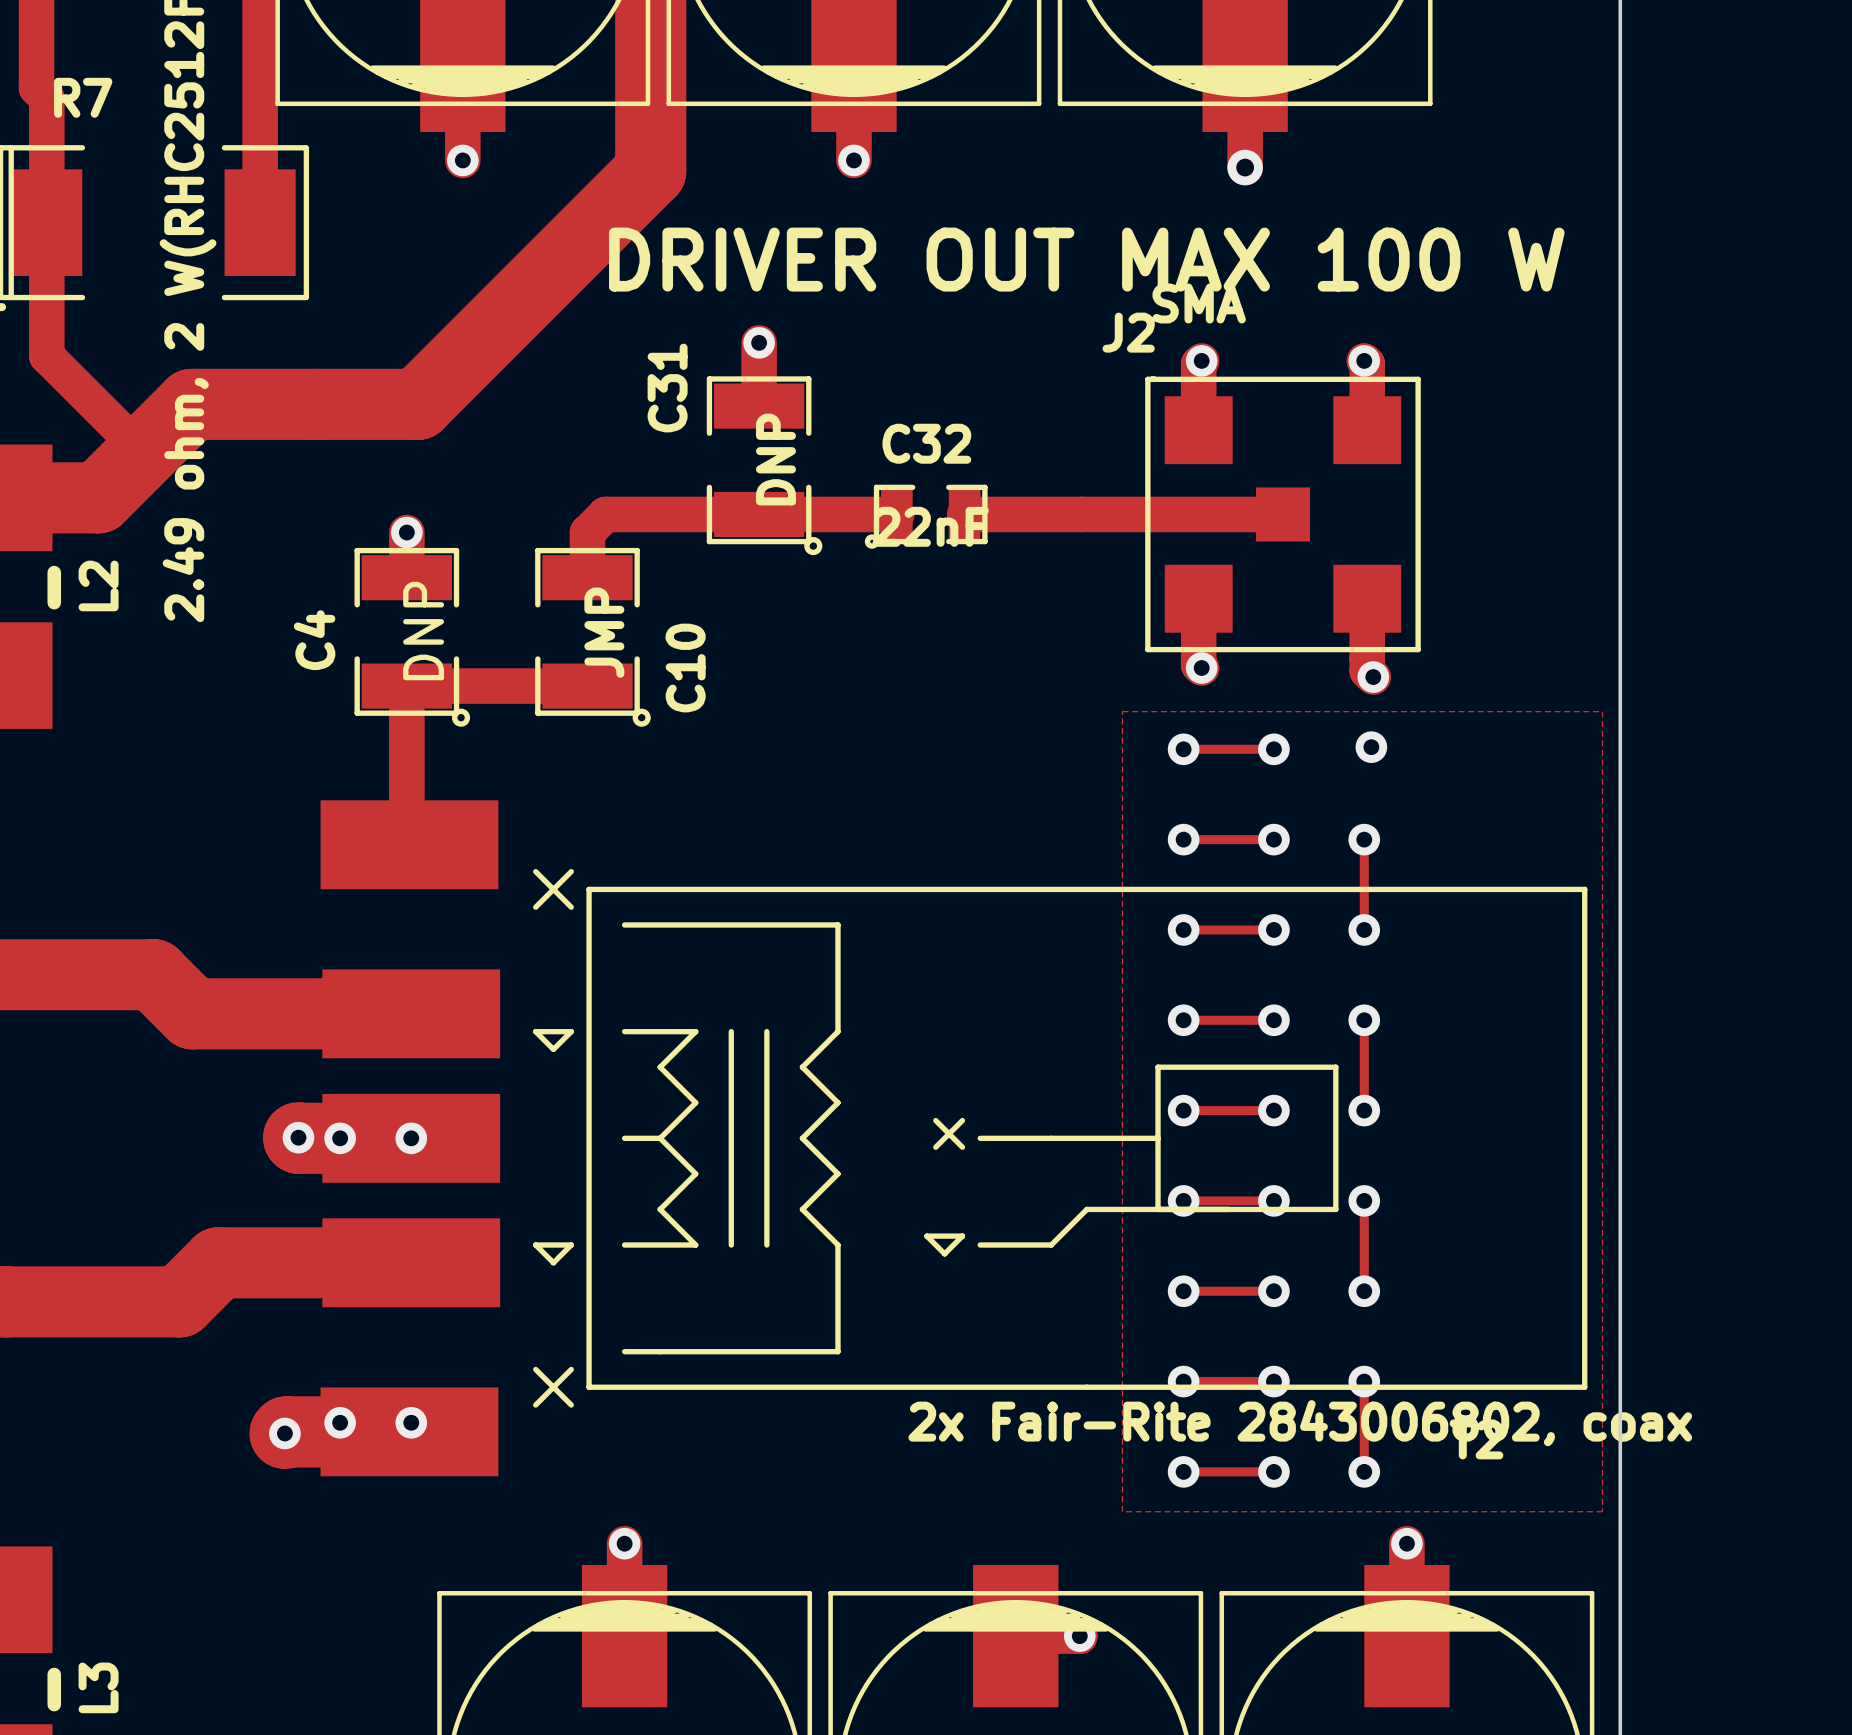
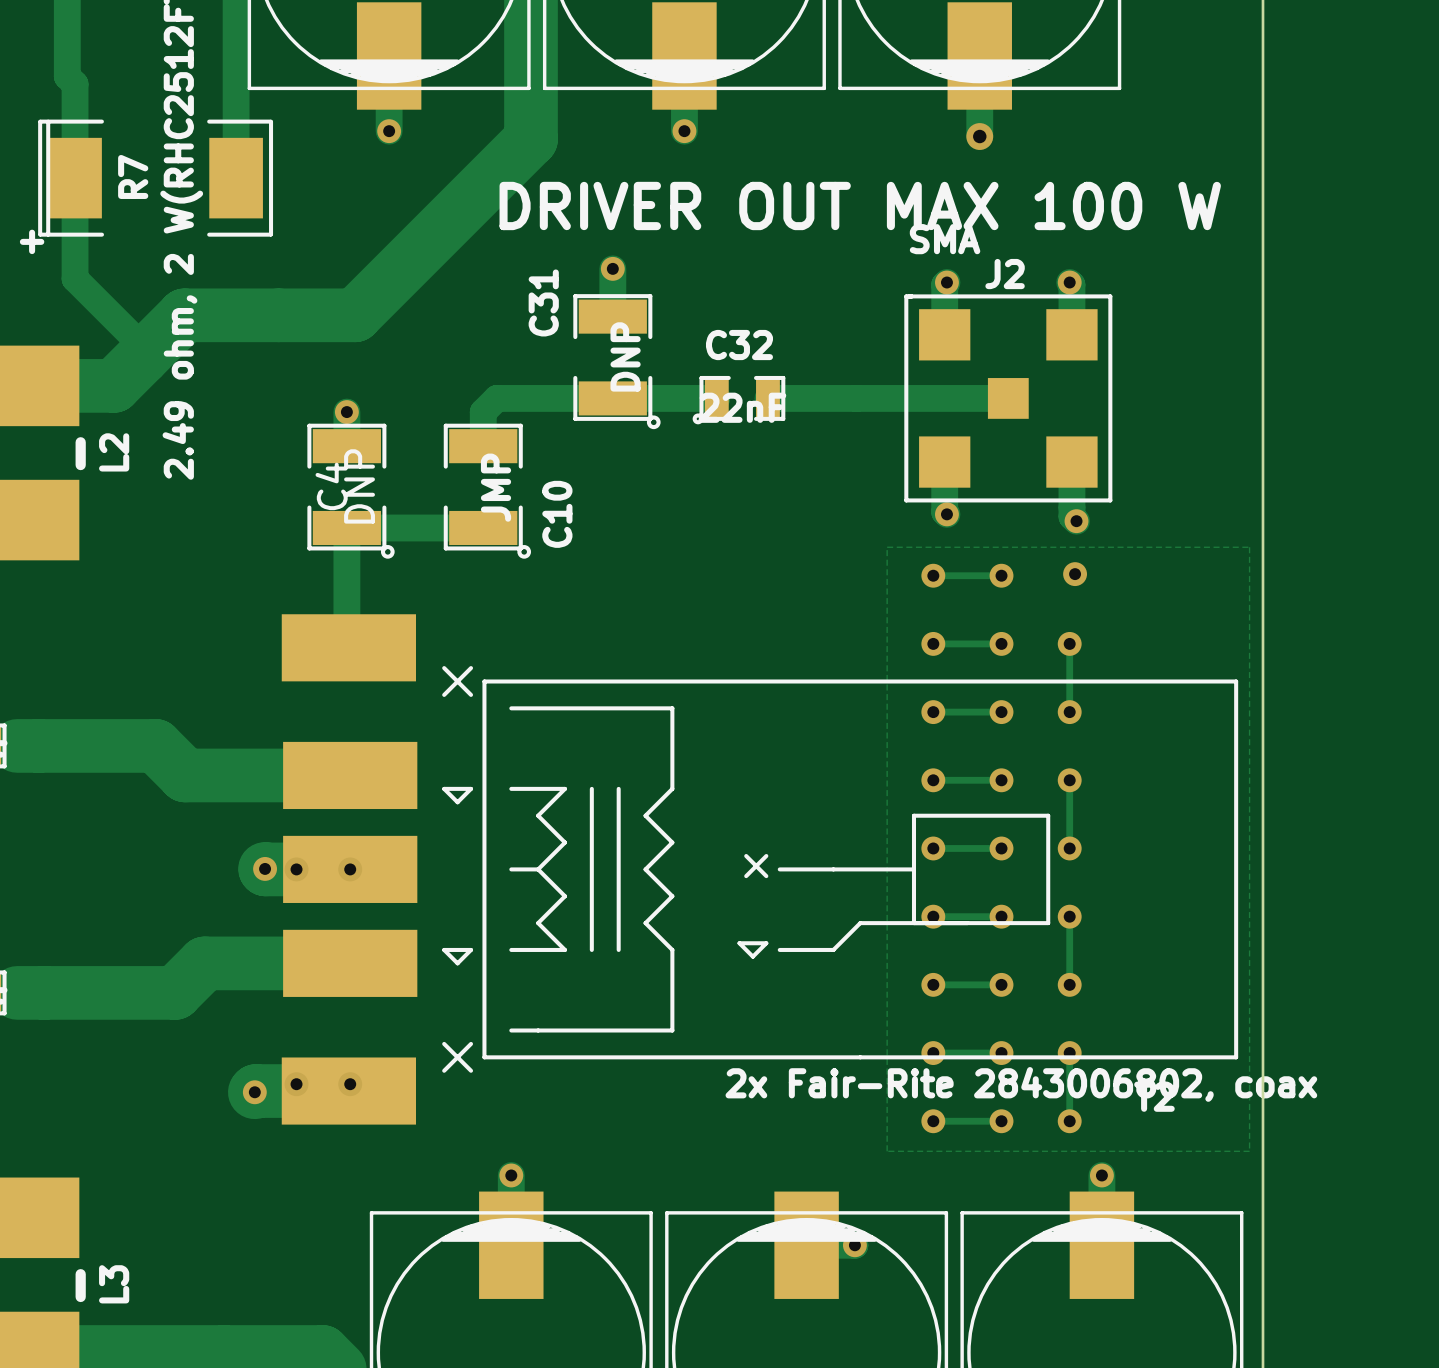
R7 name rotation: 0° (83, 97) -> 90° counterclockwise (133, 176)
R7 name position: R7 (83, 97) -> R7 (133, 176)
J2 name position: J2 (1128, 332) -> J2 (1005, 274)
C4 name position: C4 (314, 640) -> C4 (331, 486)

